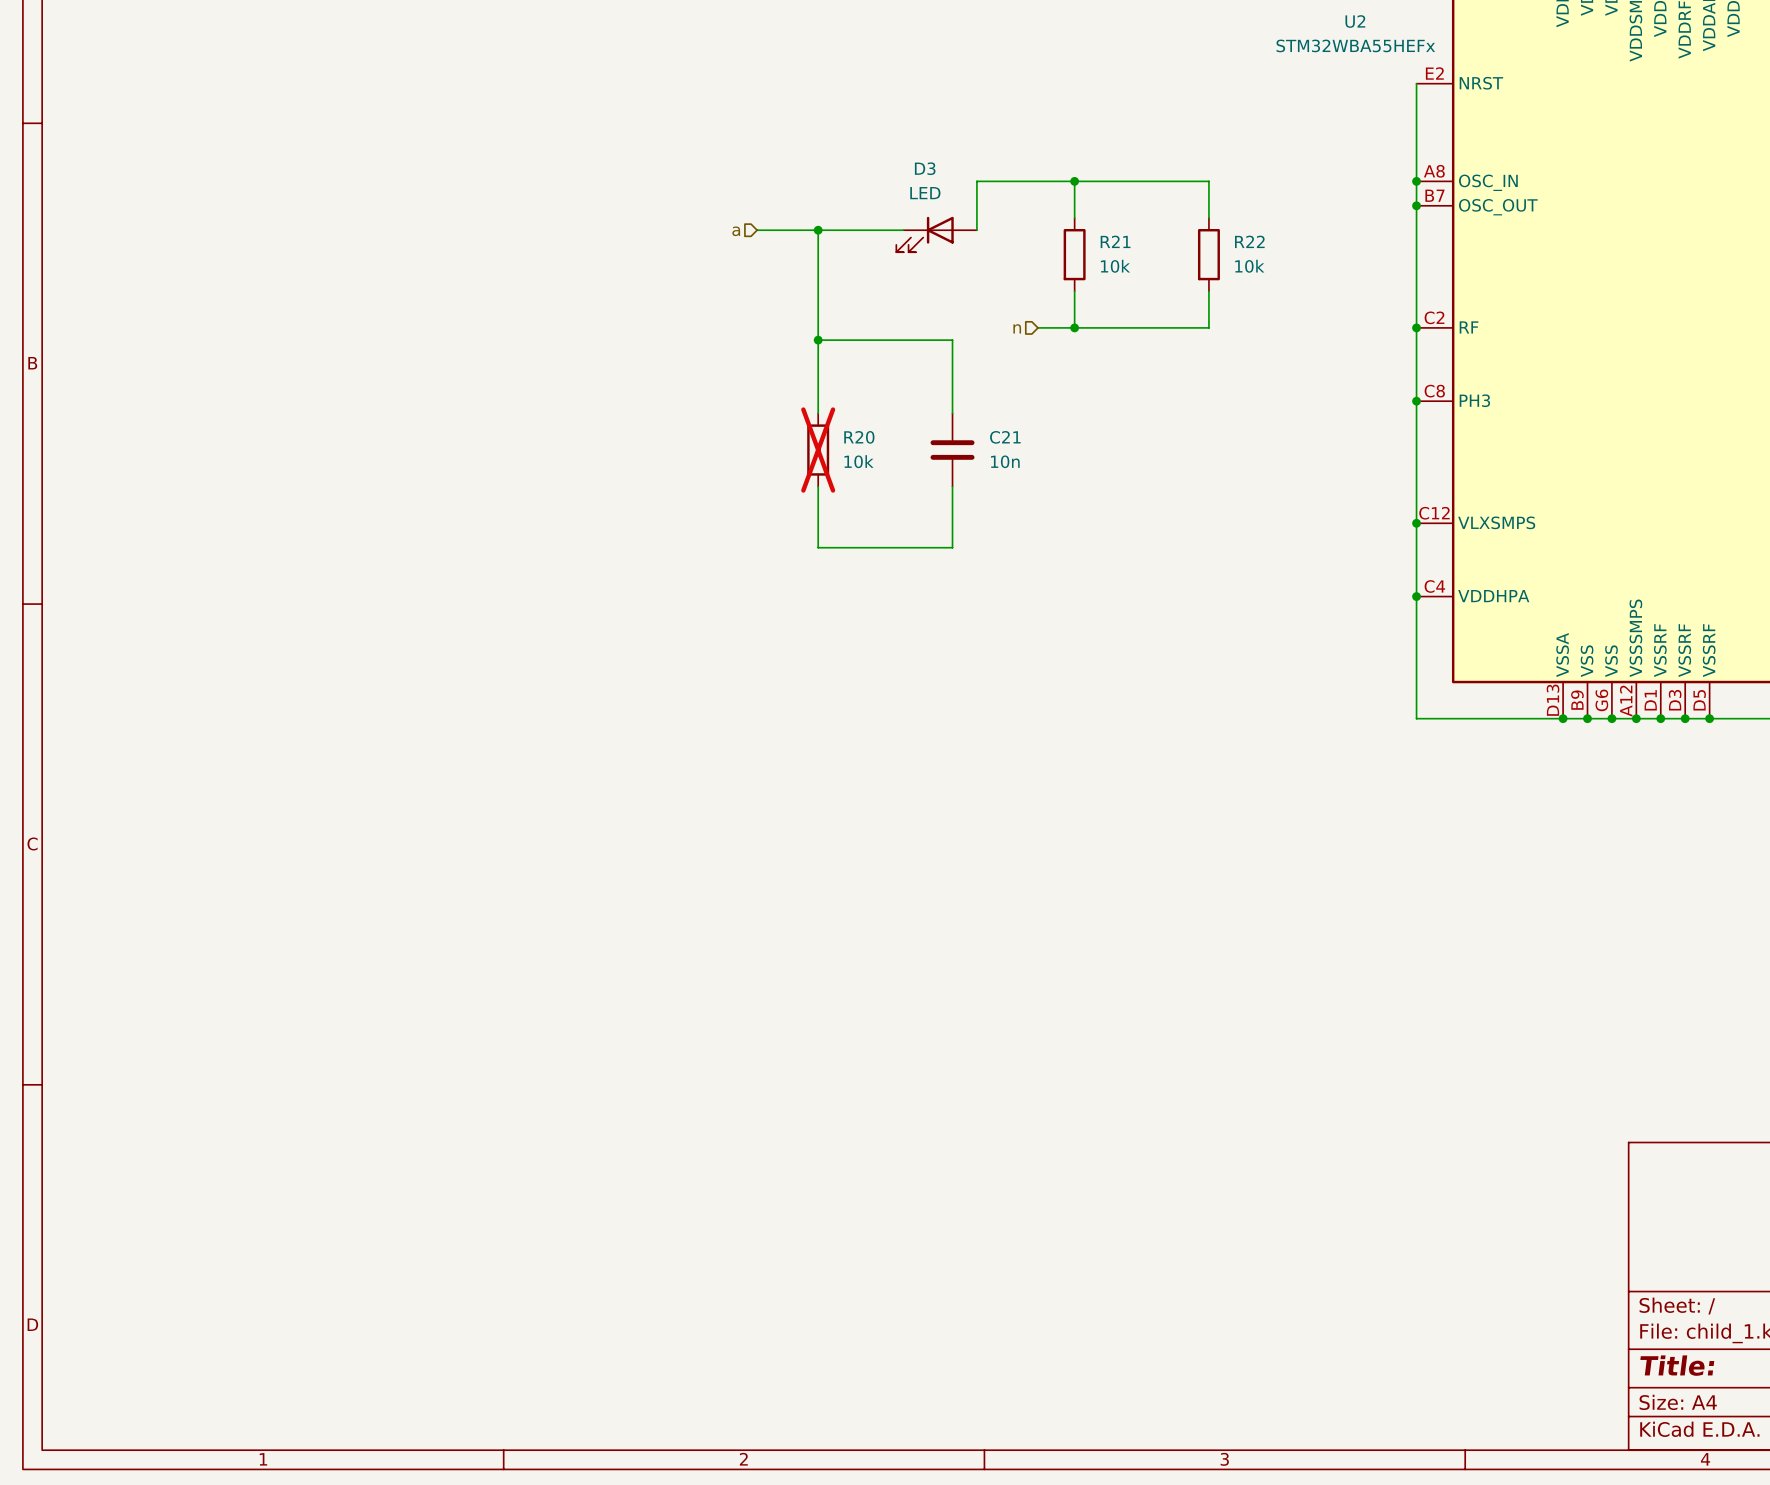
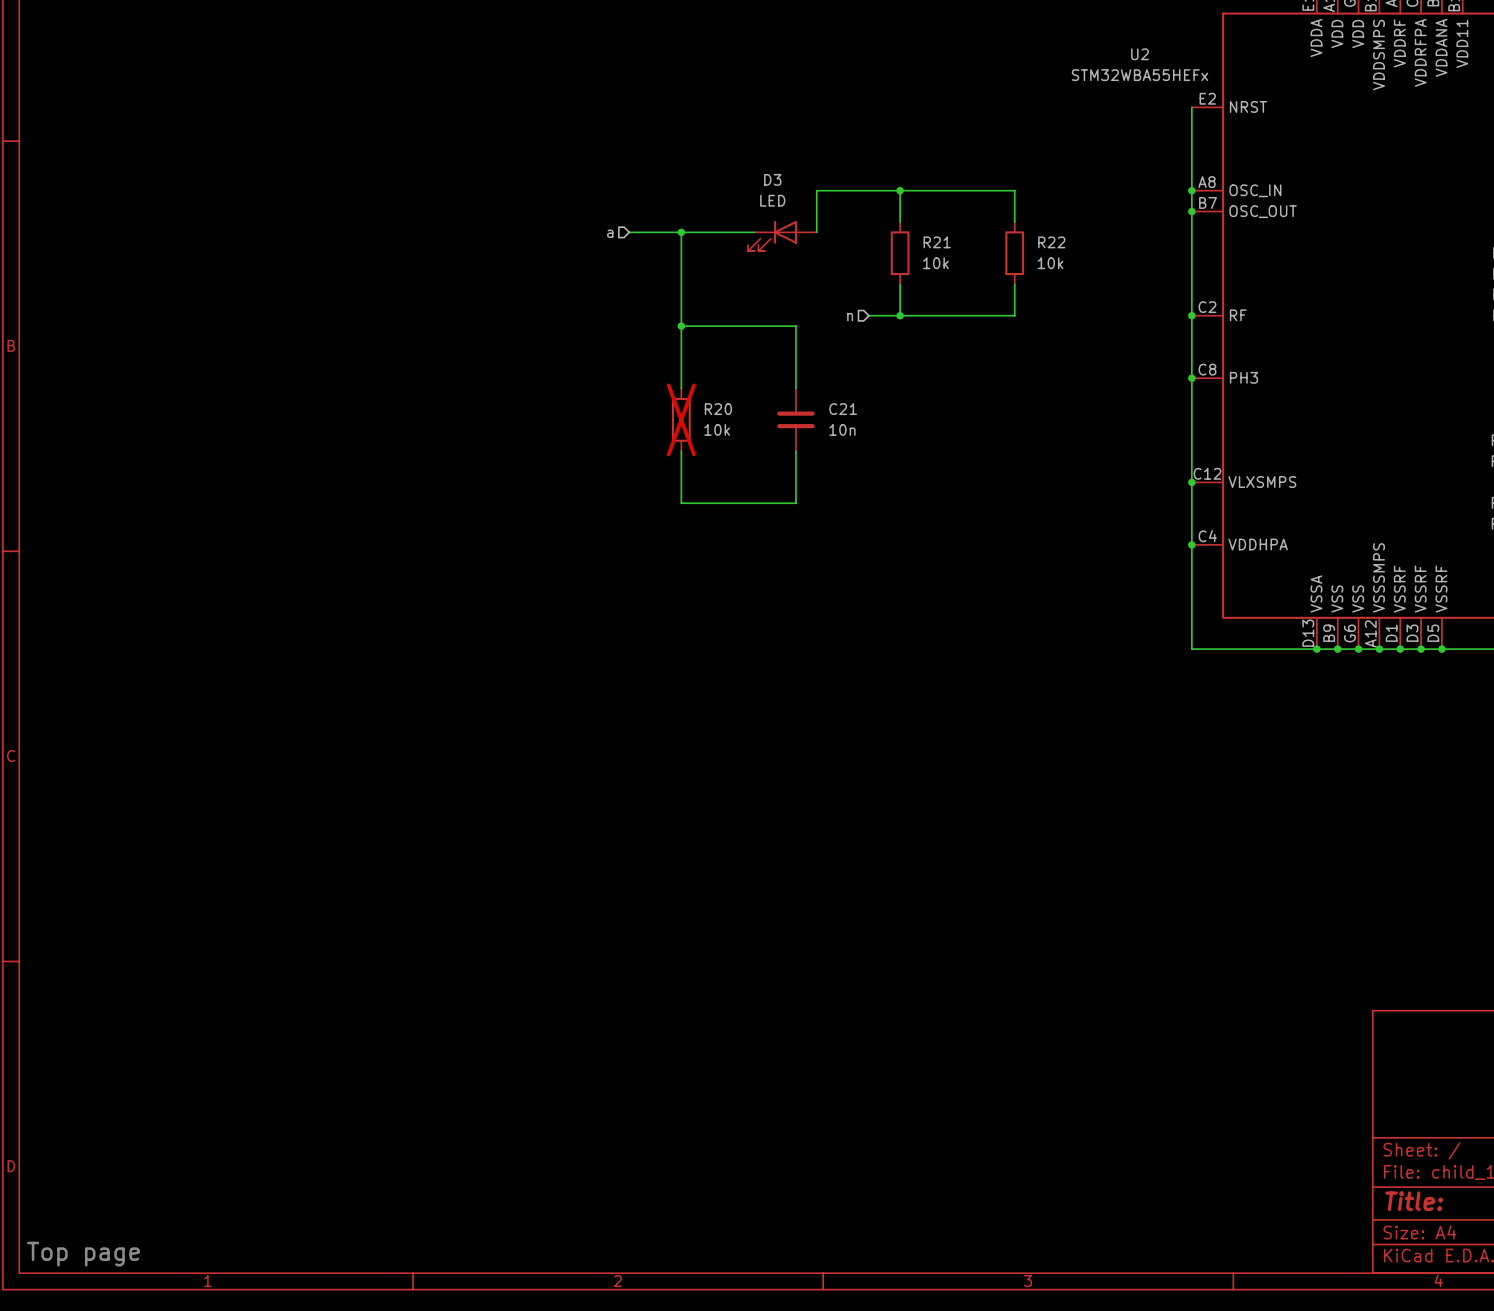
text: none -> Top page (83, 1254)

